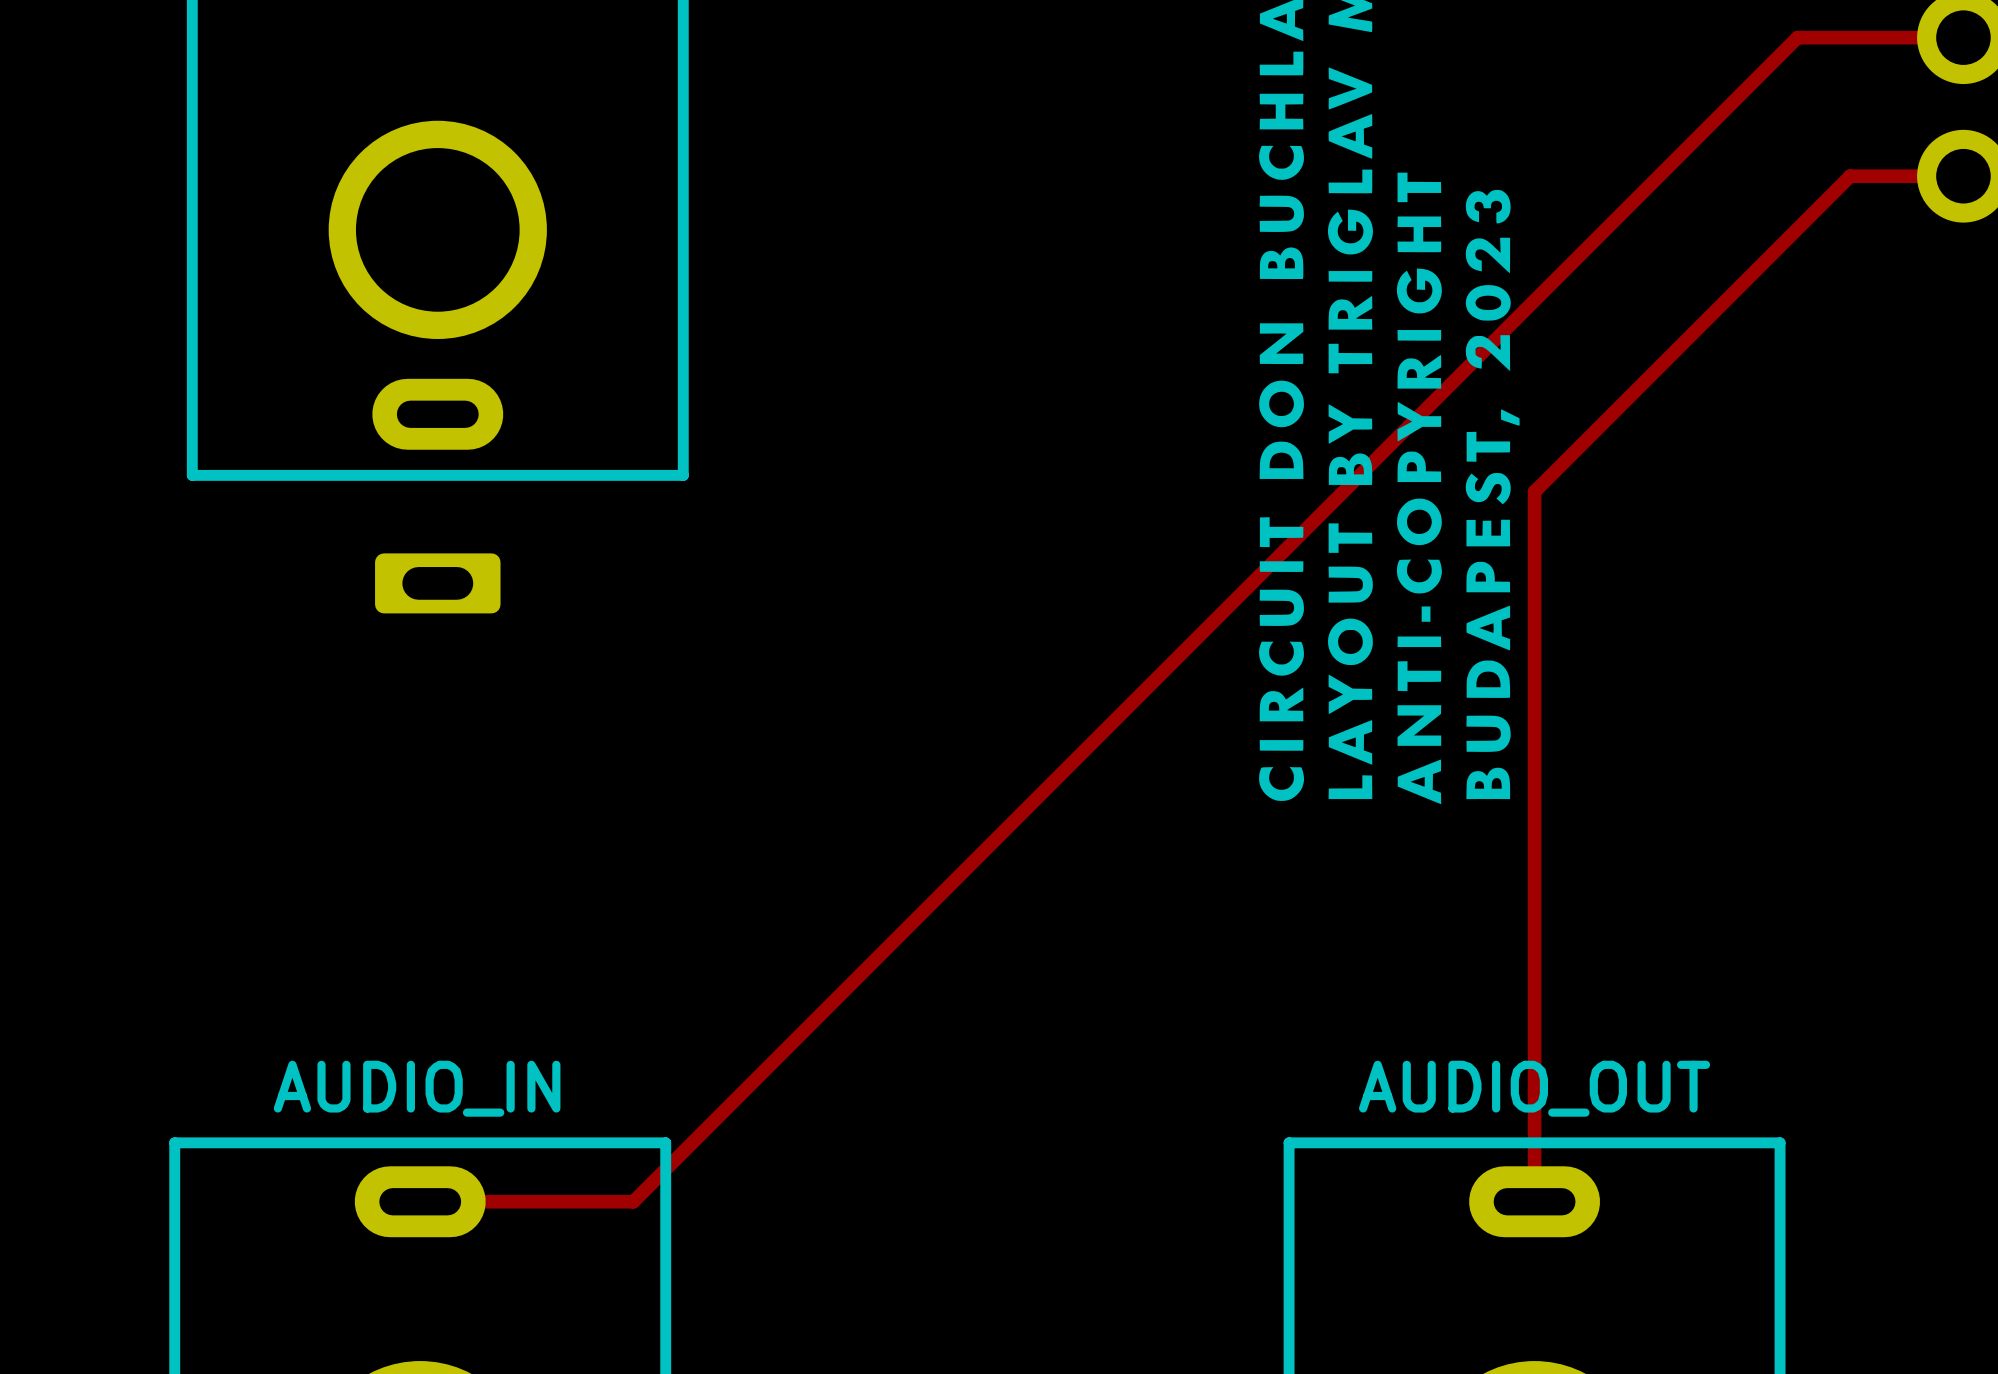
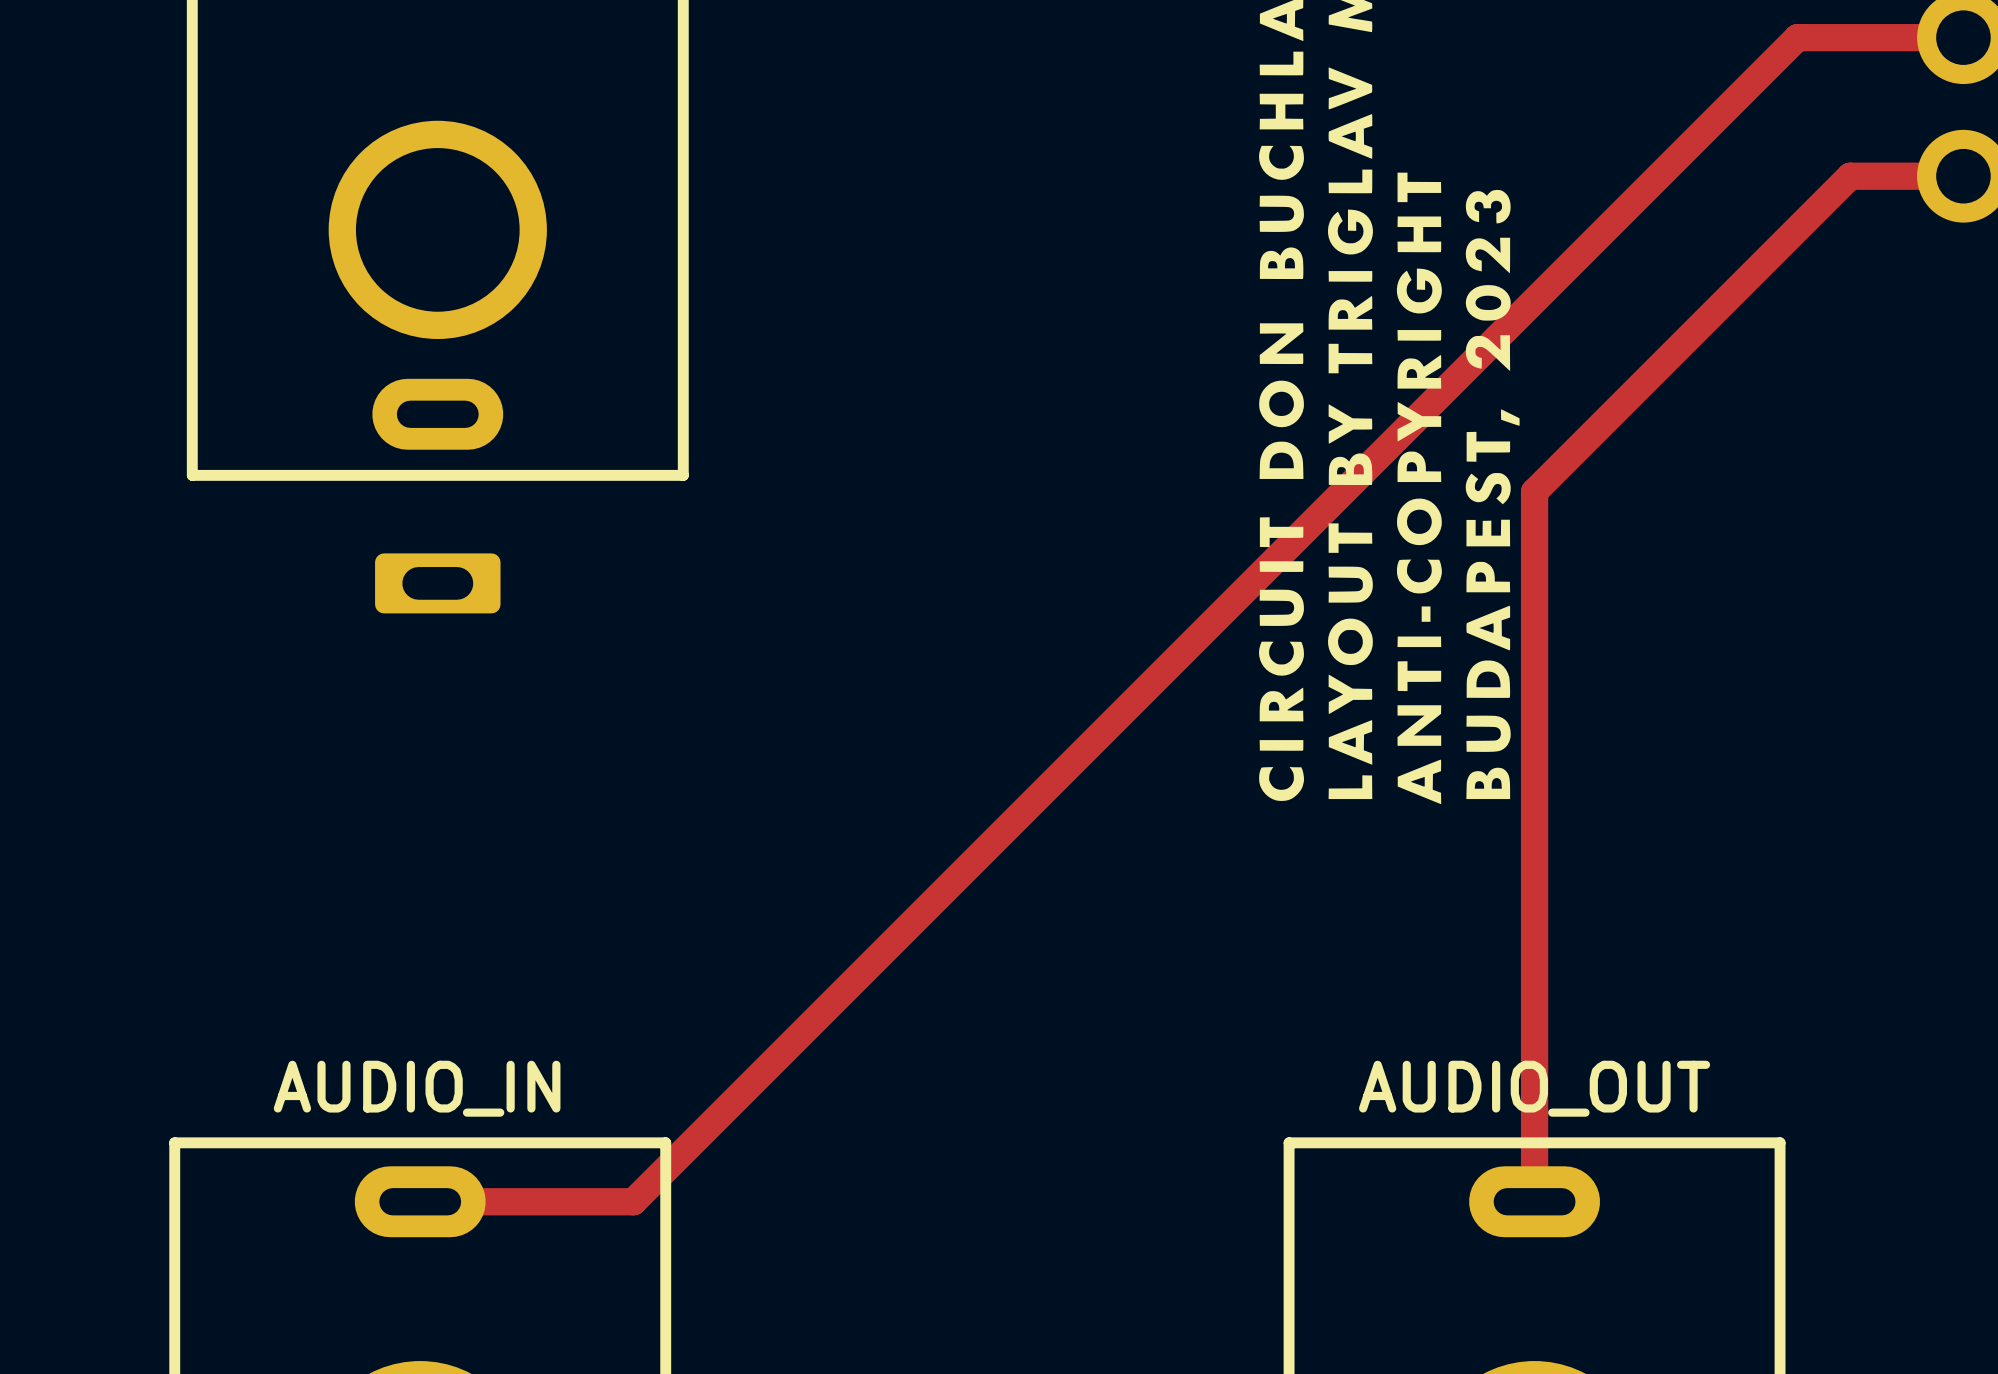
track width: thin (1963, 37) (1797, 37) (633, 1201) (437, 1201) -> thick (1963, 37) (1797, 37) (633, 1201) (437, 1201)
track width: thin (1963, 176) (1850, 176) (1534, 491) (1534, 1201) -> thick (1963, 176) (1850, 176) (1534, 491) (1534, 1201)

